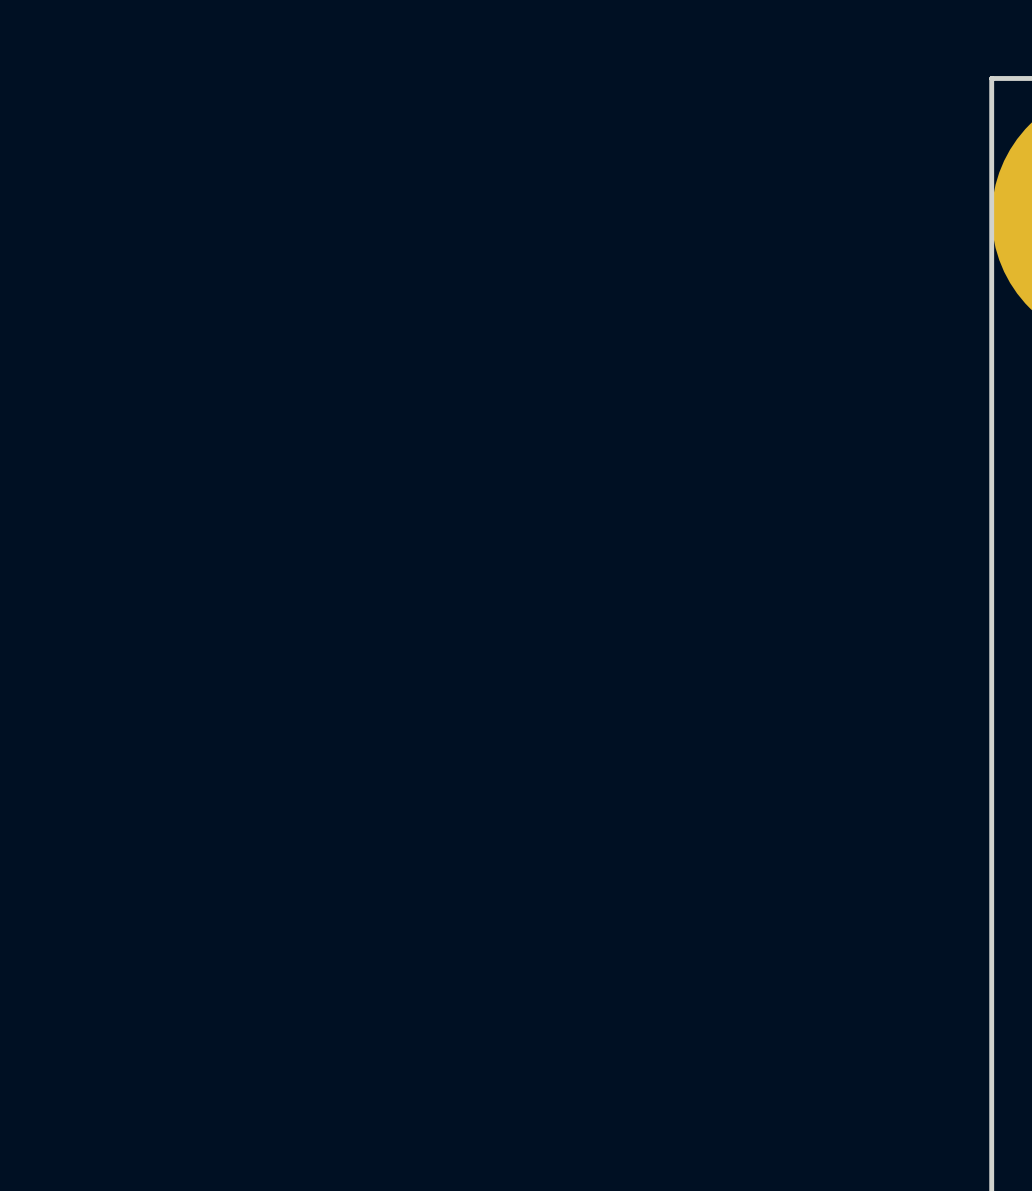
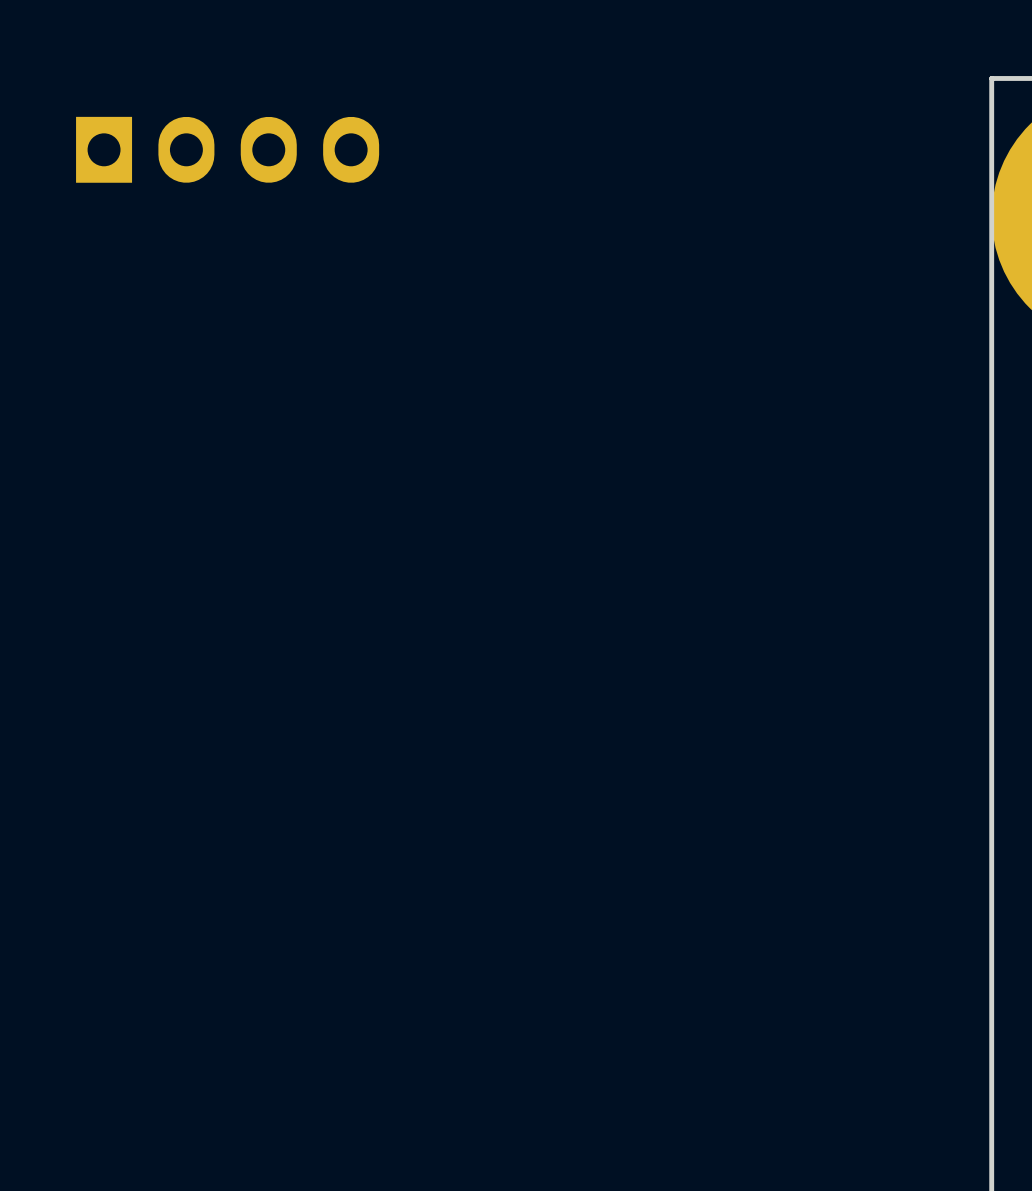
part: none -> (227, 149)

